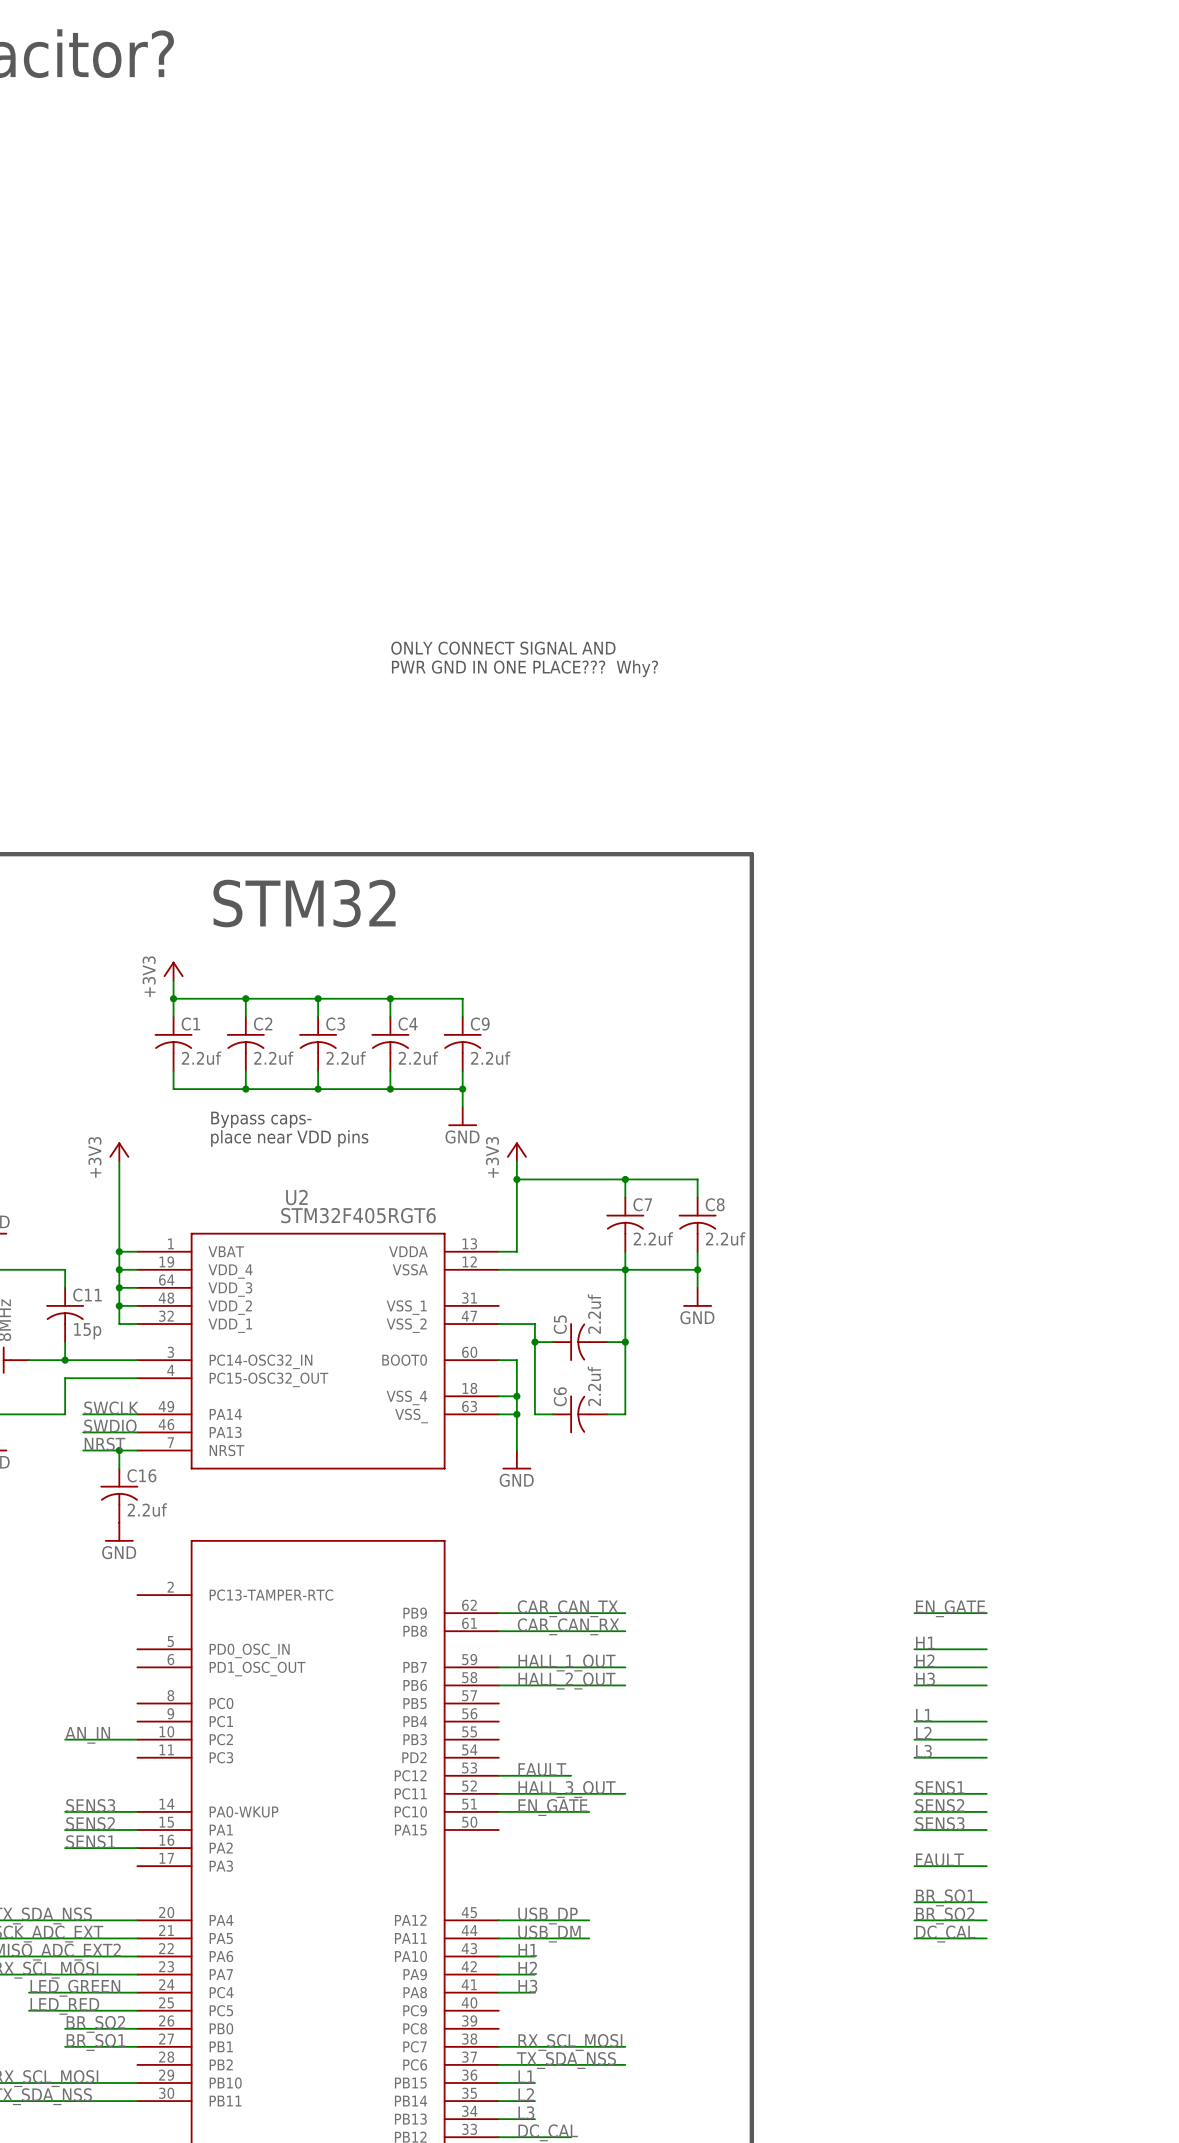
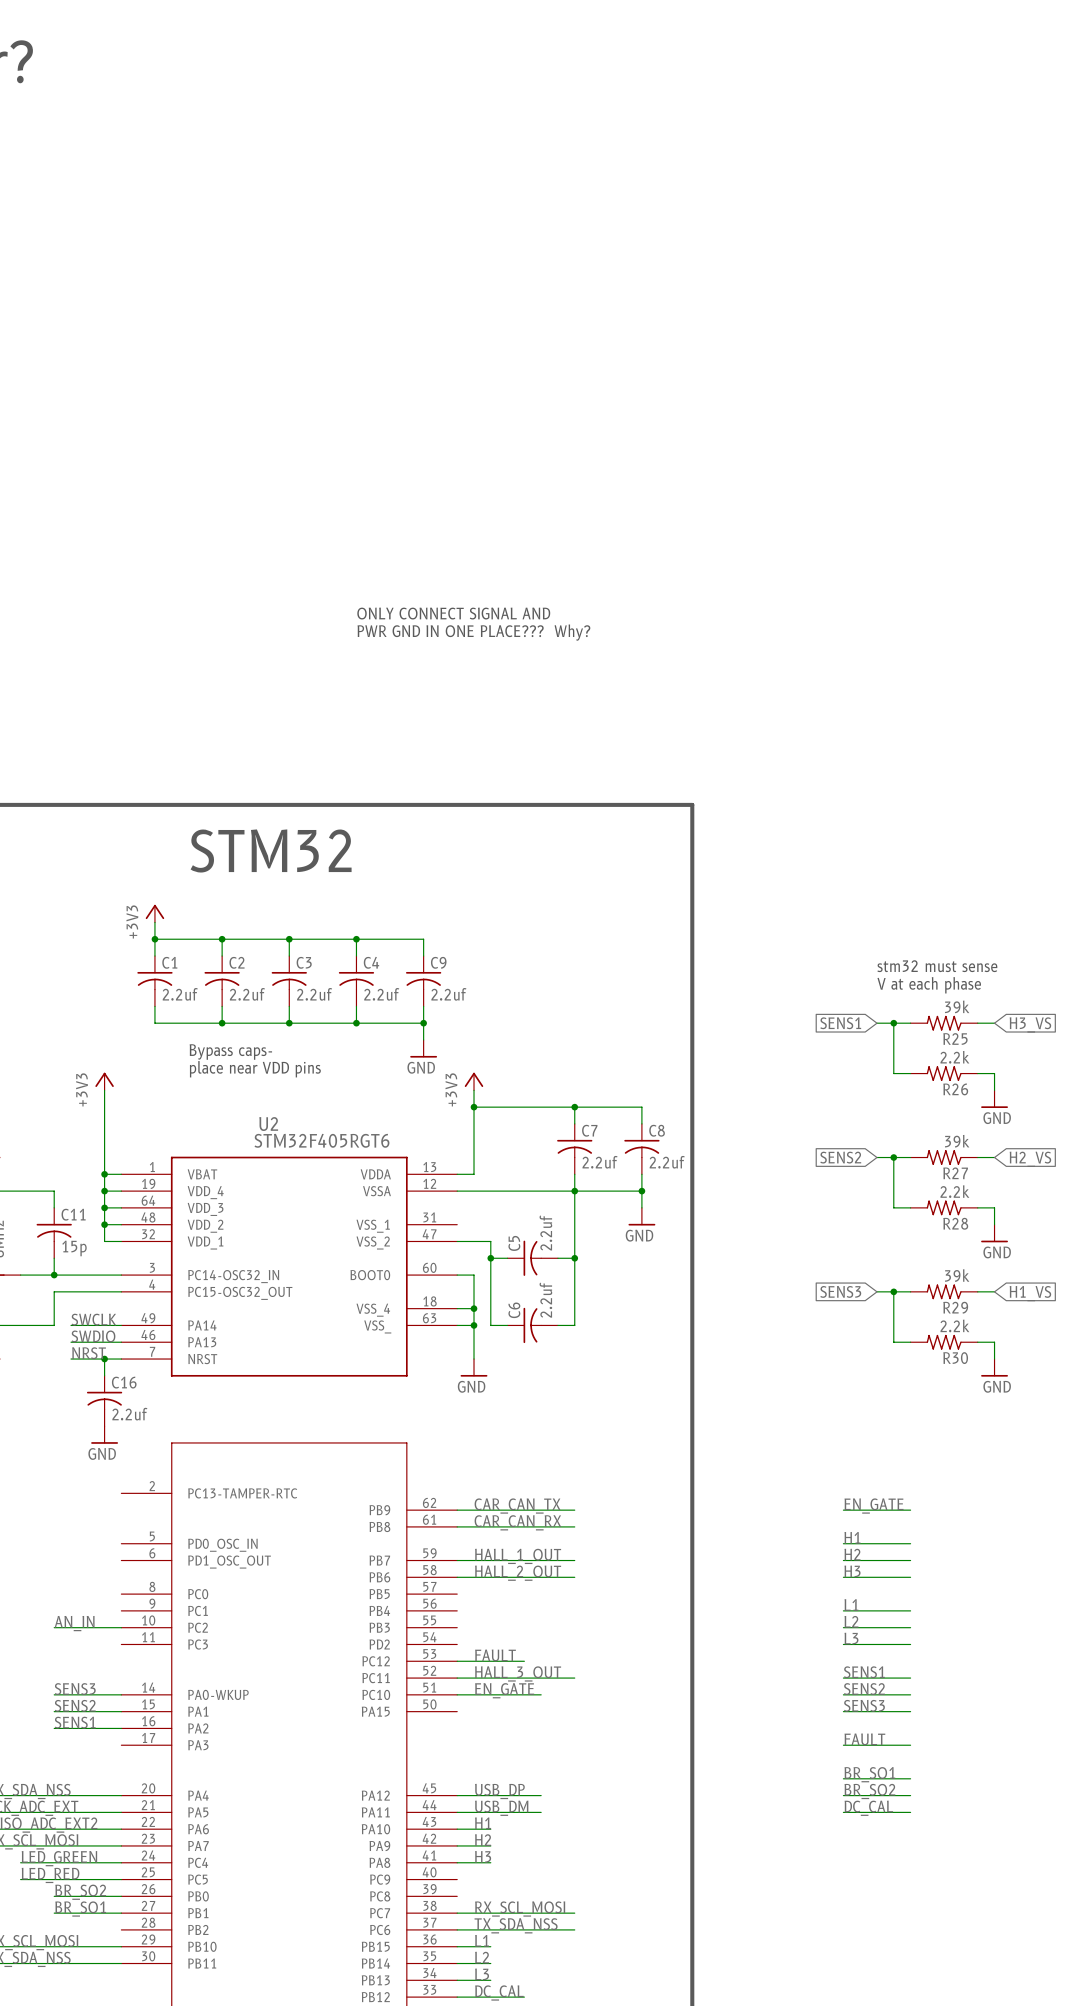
text: none -> stm32 must sense (937, 966)
text: none -> V at each phase (929, 985)
global label: none -> SENS1 (840, 1023)
wire: none -> (876, 1023) (910, 1023)
wire: none -> (893, 1023) (893, 1073) (910, 1073)
junction: none -> (893, 1023)
R25: none -> 39k (944, 1023)
wire: none -> (977, 1023) (994, 1023)
global label: none -> H3_VS (1030, 1024)
R26: none -> 2.2k (944, 1073)
wire: none -> (977, 1073) (994, 1073) (994, 1090)
power symbol: none -> GND (994, 1099)
global label: none -> SENS2 (840, 1157)
wire: none -> (876, 1157) (910, 1157)
wire: none -> (893, 1157) (893, 1207) (910, 1207)
junction: none -> (893, 1157)
R27: none -> 39k (944, 1157)
wire: none -> (977, 1157) (994, 1157)
global label: none -> H2_VS (1030, 1159)
R28: none -> 2.2k (944, 1207)
wire: none -> (977, 1207) (994, 1207) (994, 1224)
power symbol: none -> GND (994, 1233)
global label: none -> SENS3 (840, 1291)
wire: none -> (876, 1291) (910, 1291)
wire: none -> (893, 1291) (893, 1342) (910, 1342)
junction: none -> (893, 1291)
R29: none -> 39k (944, 1291)
wire: none -> (977, 1291) (994, 1291)
global label: none -> H1_VS (1030, 1293)
R30: none -> 2.2k (944, 1342)
wire: none -> (977, 1342) (994, 1342) (994, 1359)
power symbol: none -> GND (994, 1367)

